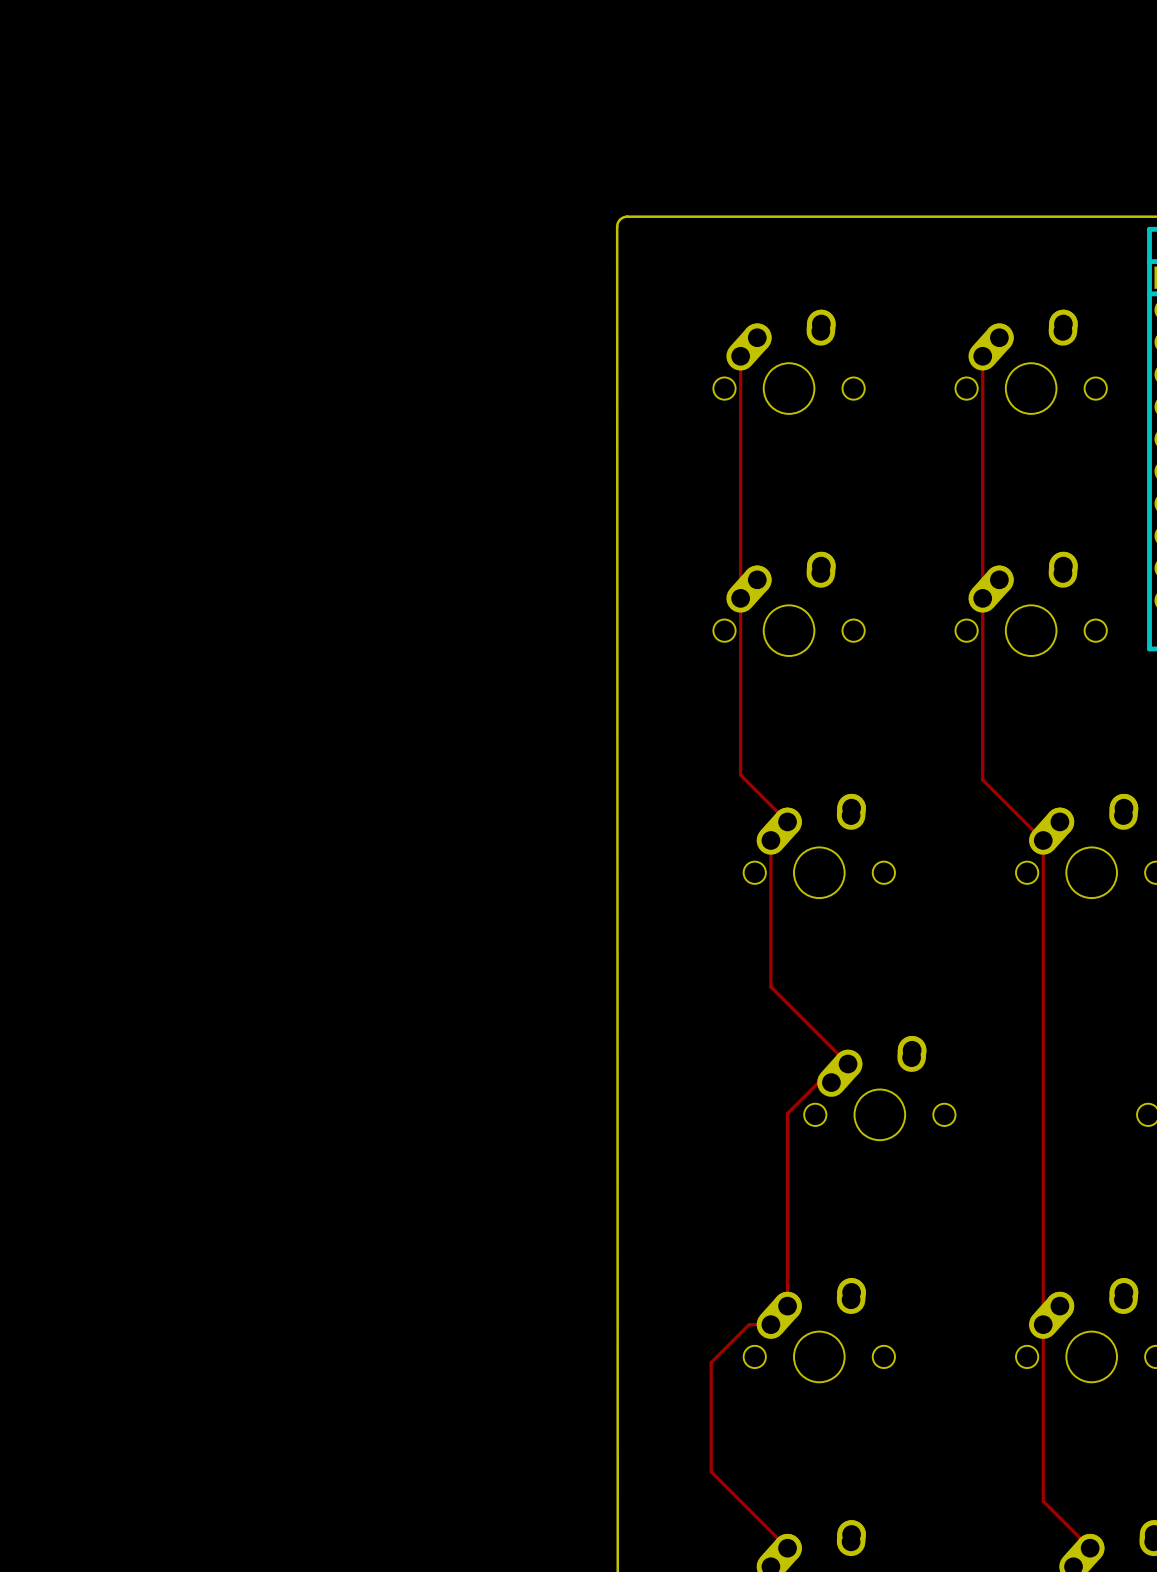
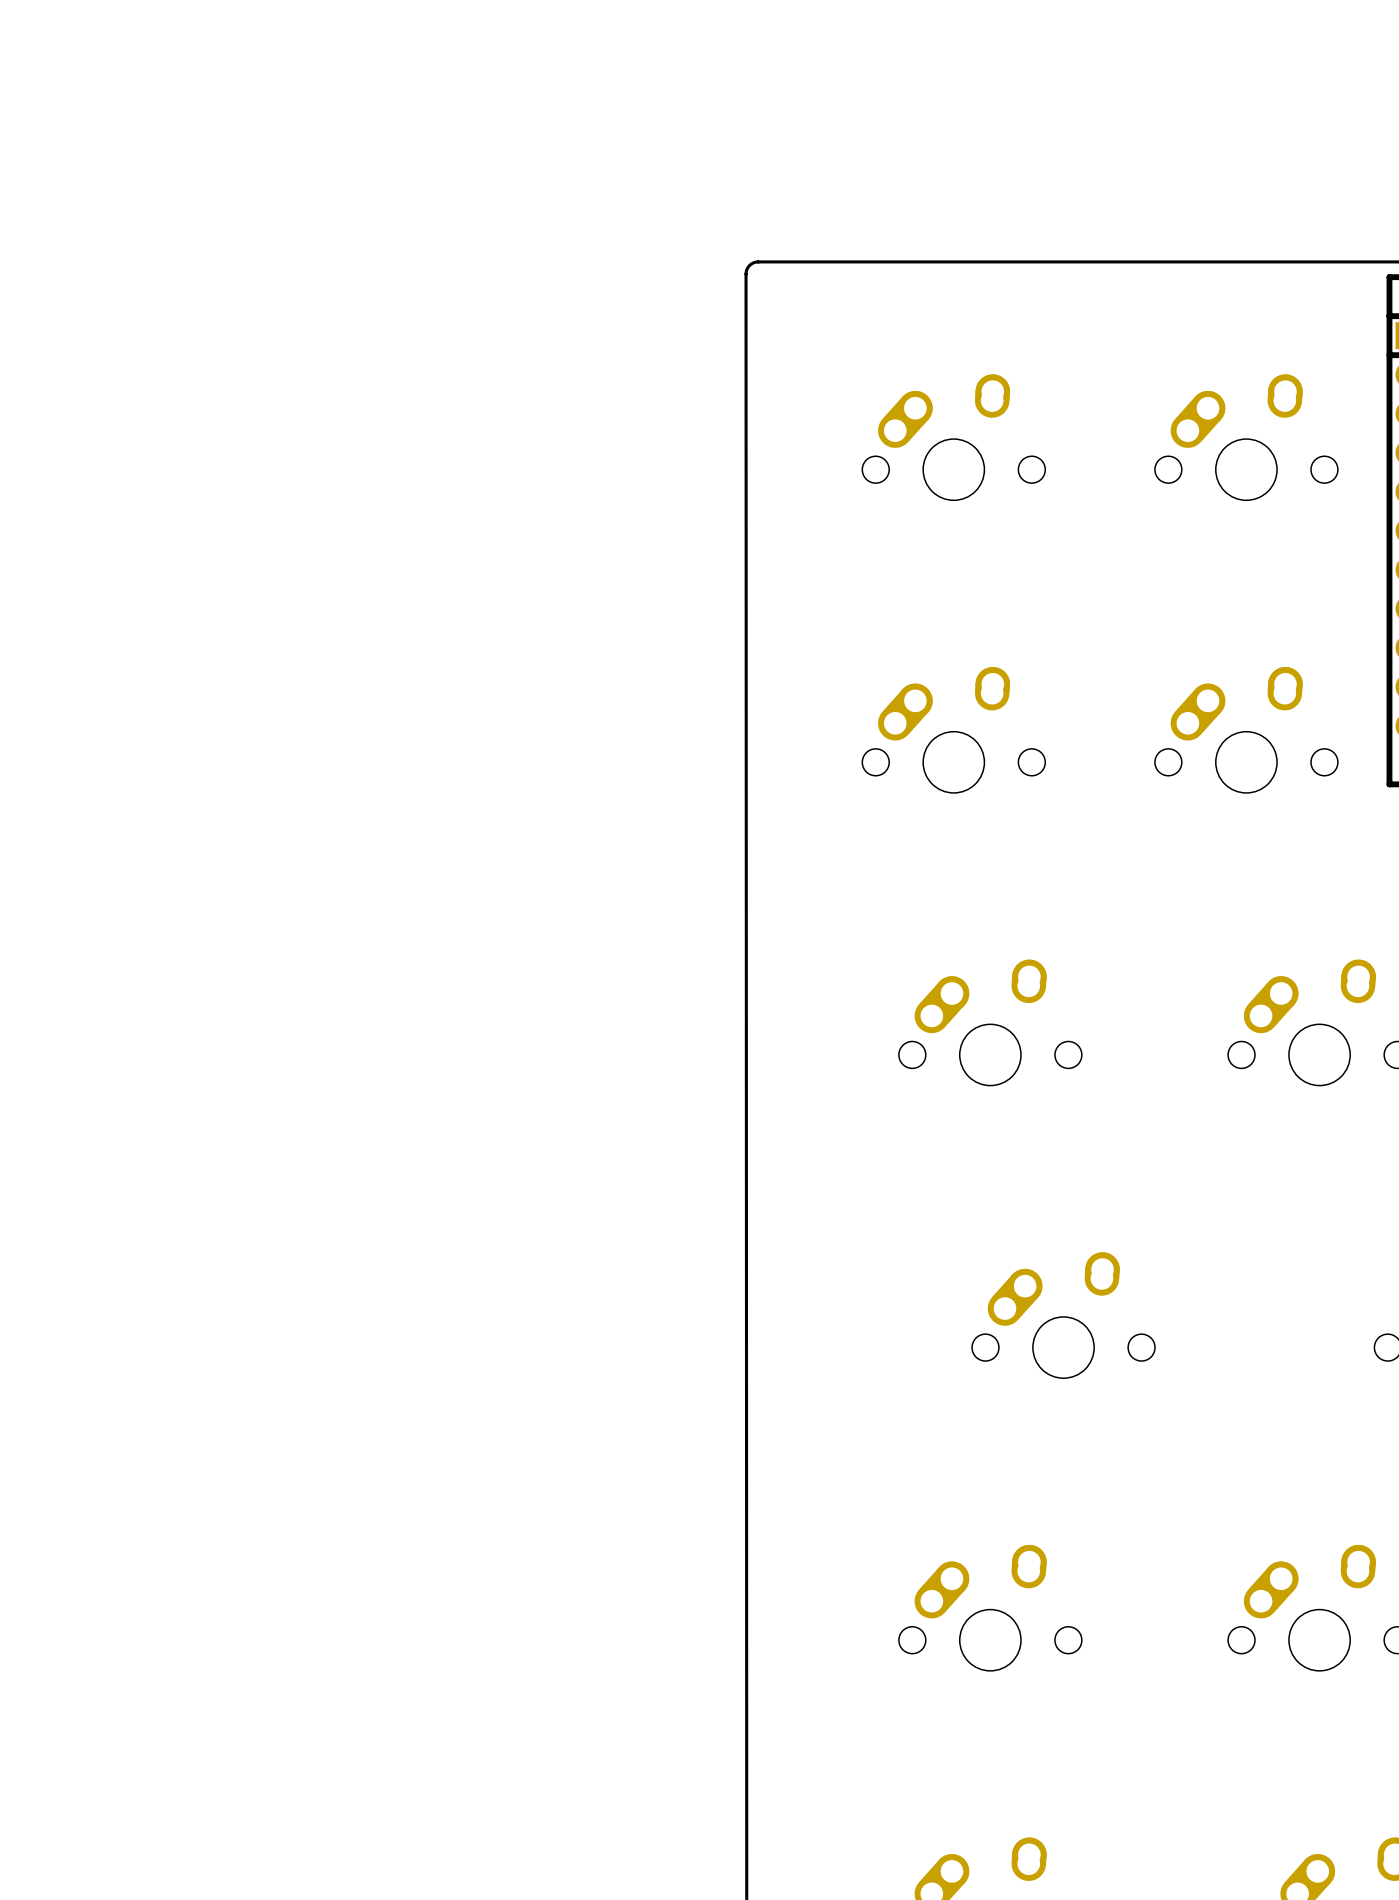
track: (740, 356) (740, 775) (787, 821) -> none
track: (982, 356) (982, 779) (1043, 840) (1043, 1501) (1090, 1548) -> none
track: (770, 840) (770, 986) (848, 1064) -> none
track: (831, 1082) (818, 1082) (787, 1113) (787, 1306) -> none
track: (770, 1324) (749, 1324) (711, 1362) (711, 1471) (787, 1548) -> none

